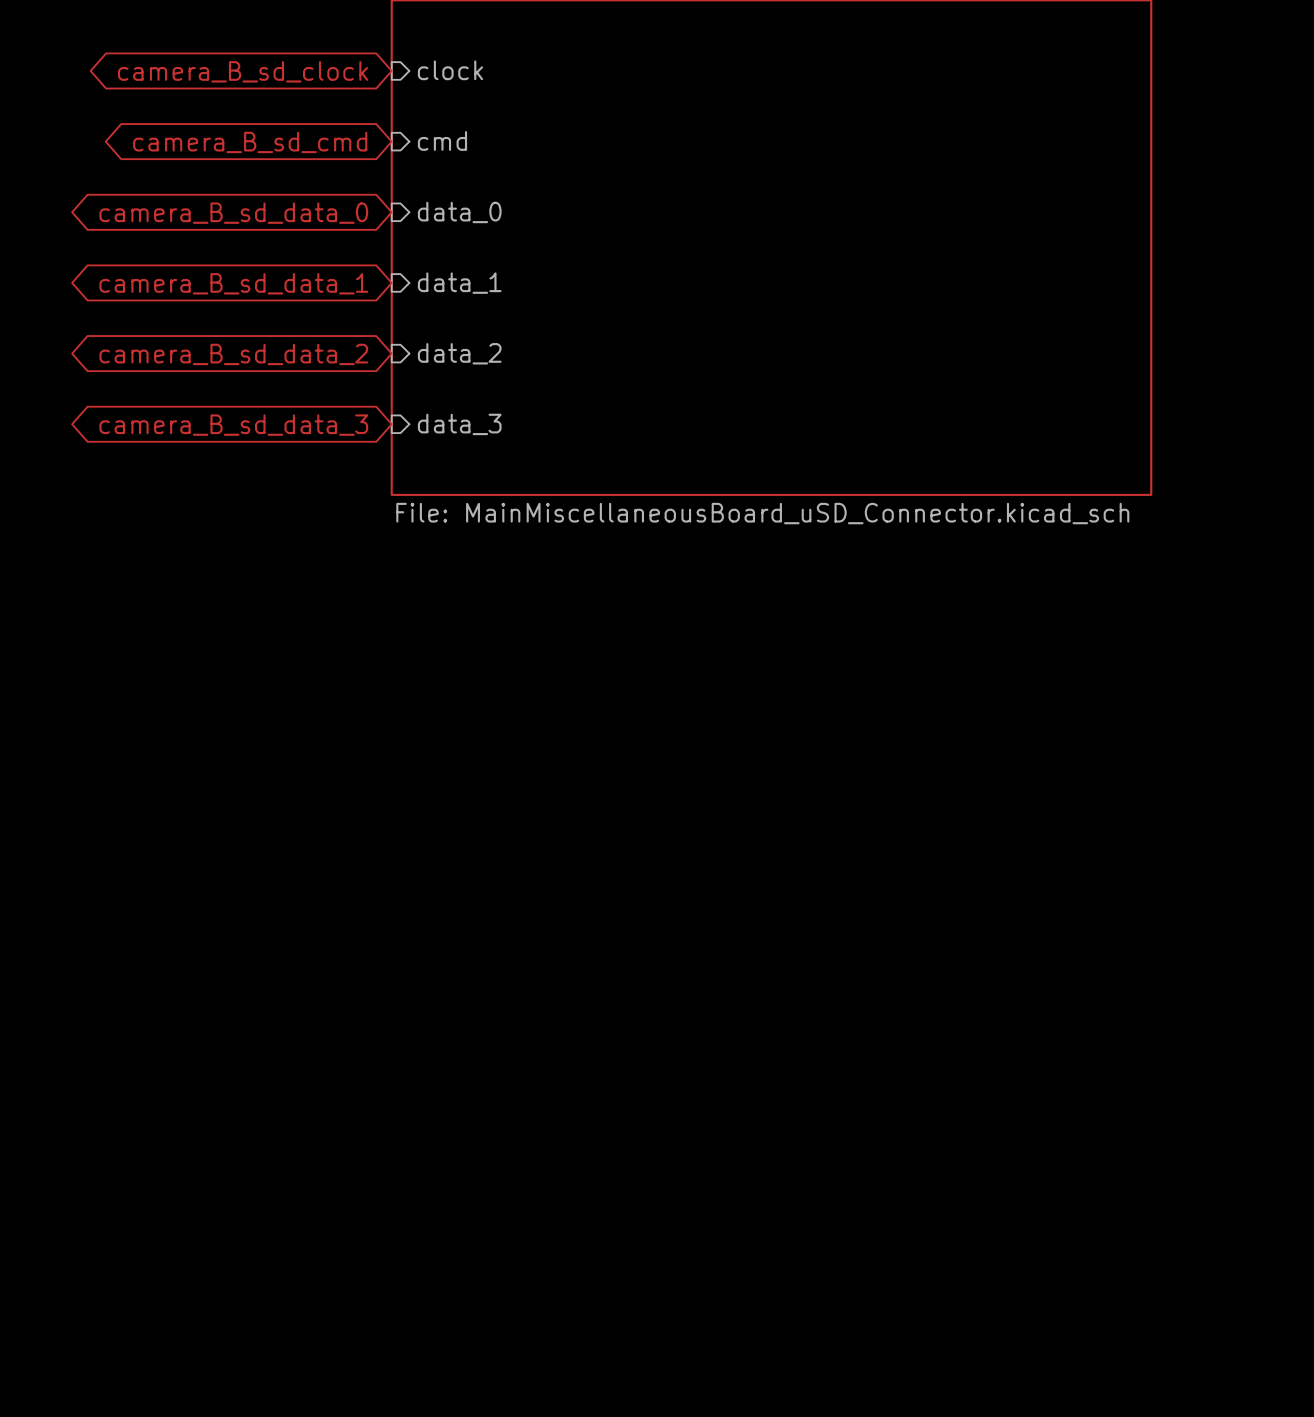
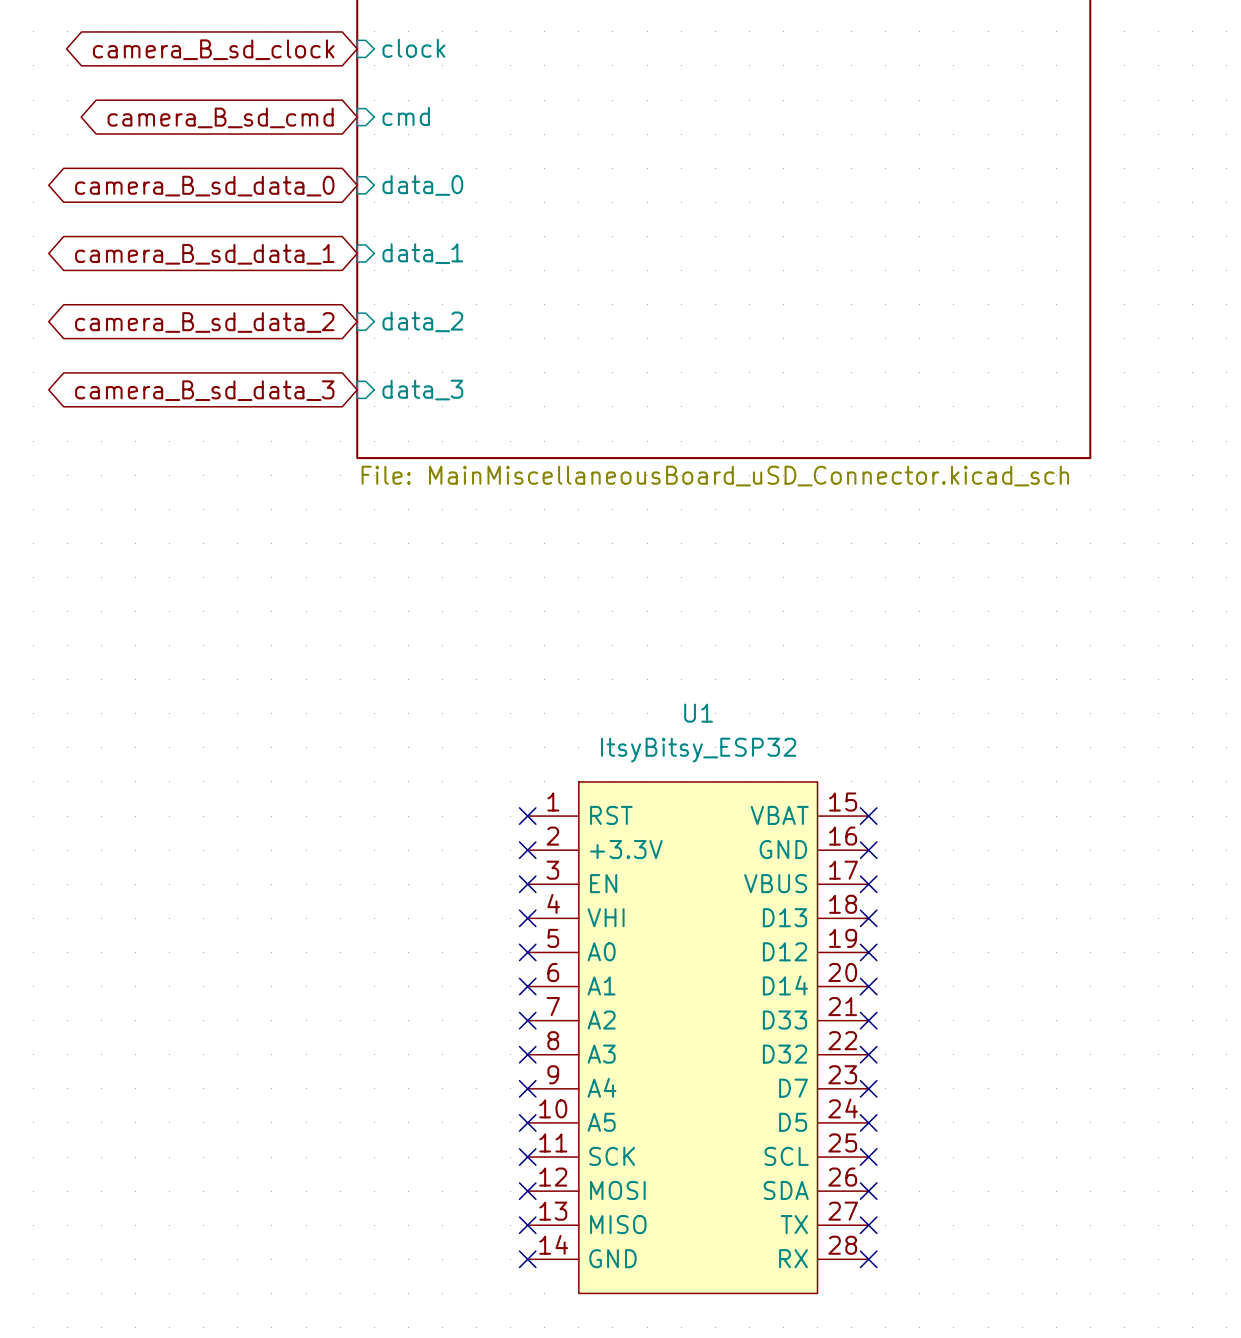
no-connect mark: none -> (527, 816)
no-connect mark: none -> (868, 816)
no-connect mark: none -> (527, 850)
no-connect mark: none -> (868, 850)
no-connect mark: none -> (527, 884)
no-connect mark: none -> (868, 884)
no-connect mark: none -> (527, 918)
no-connect mark: none -> (868, 918)
no-connect mark: none -> (527, 952)
no-connect mark: none -> (868, 952)
no-connect mark: none -> (527, 986)
no-connect mark: none -> (868, 986)
no-connect mark: none -> (527, 1020)
no-connect mark: none -> (868, 1020)
U1: none -> ItsyBitsy_ESP32 (698, 1037)
no-connect mark: none -> (527, 1054)
no-connect mark: none -> (868, 1054)
no-connect mark: none -> (527, 1088)
no-connect mark: none -> (868, 1088)
no-connect mark: none -> (527, 1122)
no-connect mark: none -> (868, 1122)
no-connect mark: none -> (527, 1157)
no-connect mark: none -> (868, 1157)
no-connect mark: none -> (527, 1191)
no-connect mark: none -> (868, 1191)
no-connect mark: none -> (527, 1225)
no-connect mark: none -> (868, 1225)
no-connect mark: none -> (527, 1259)
no-connect mark: none -> (868, 1259)

